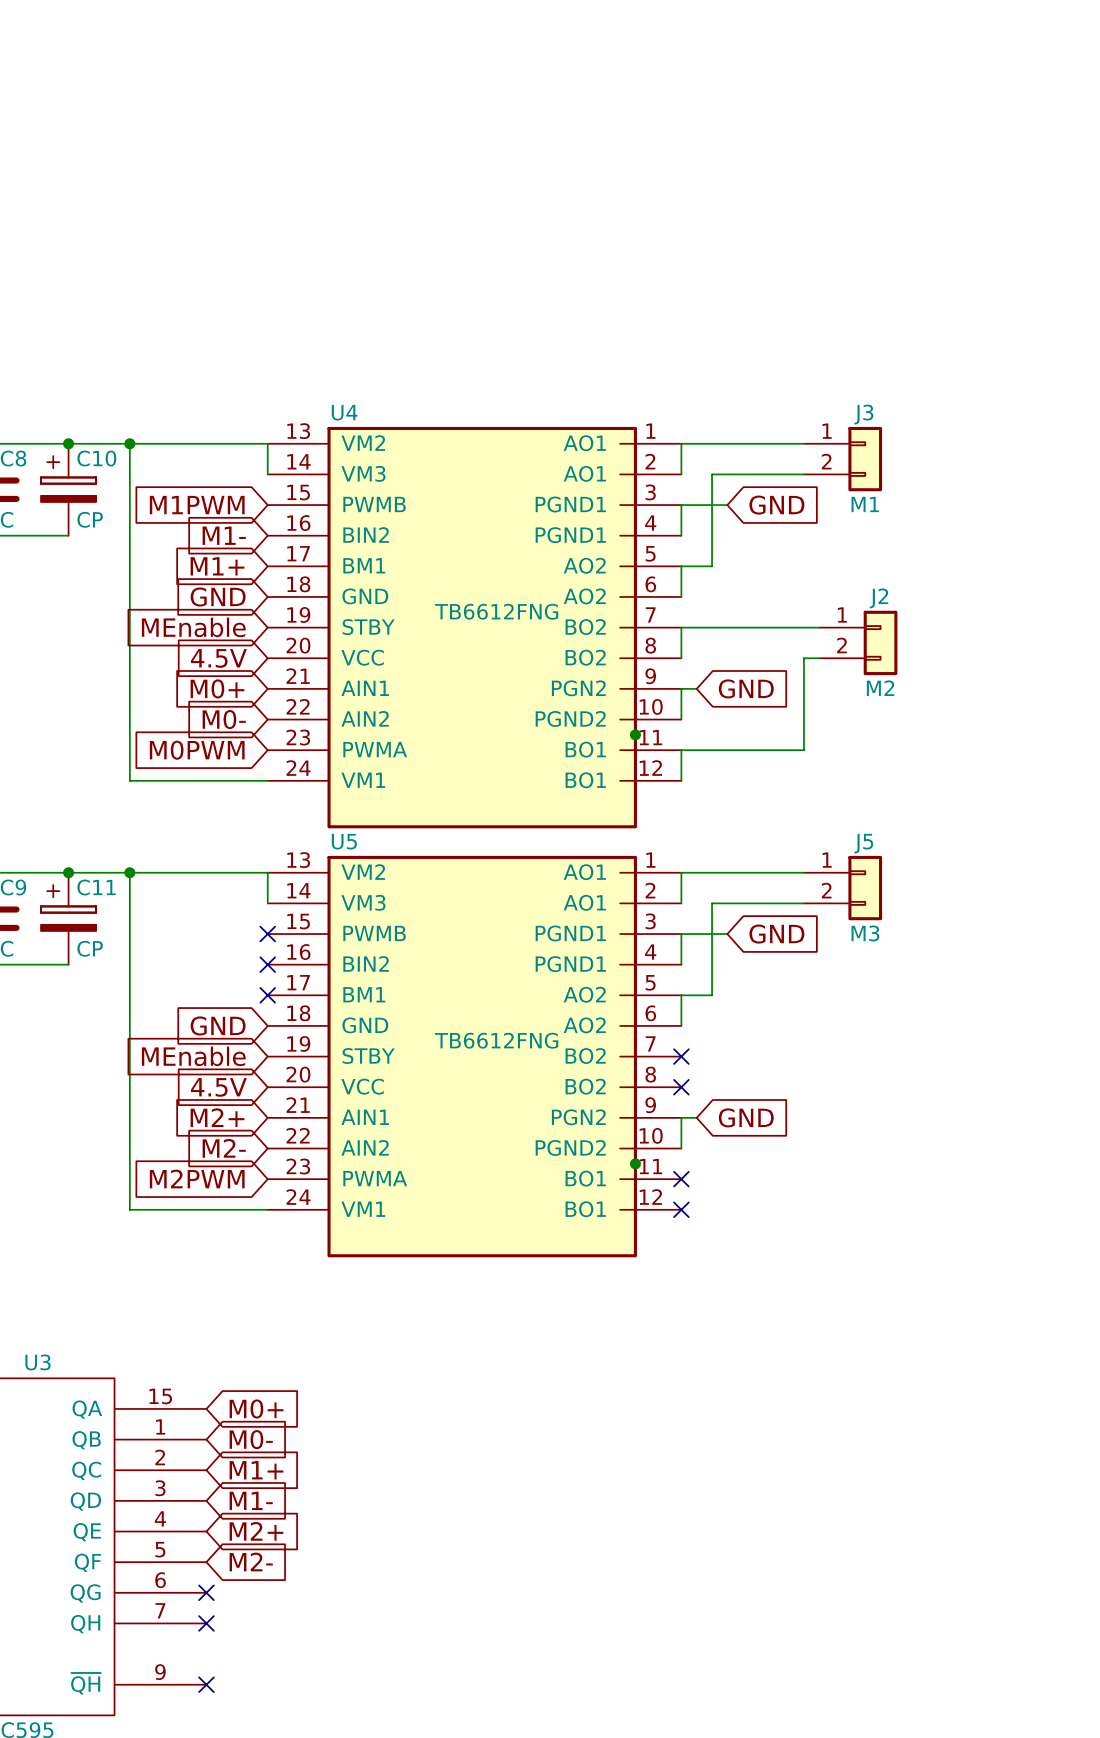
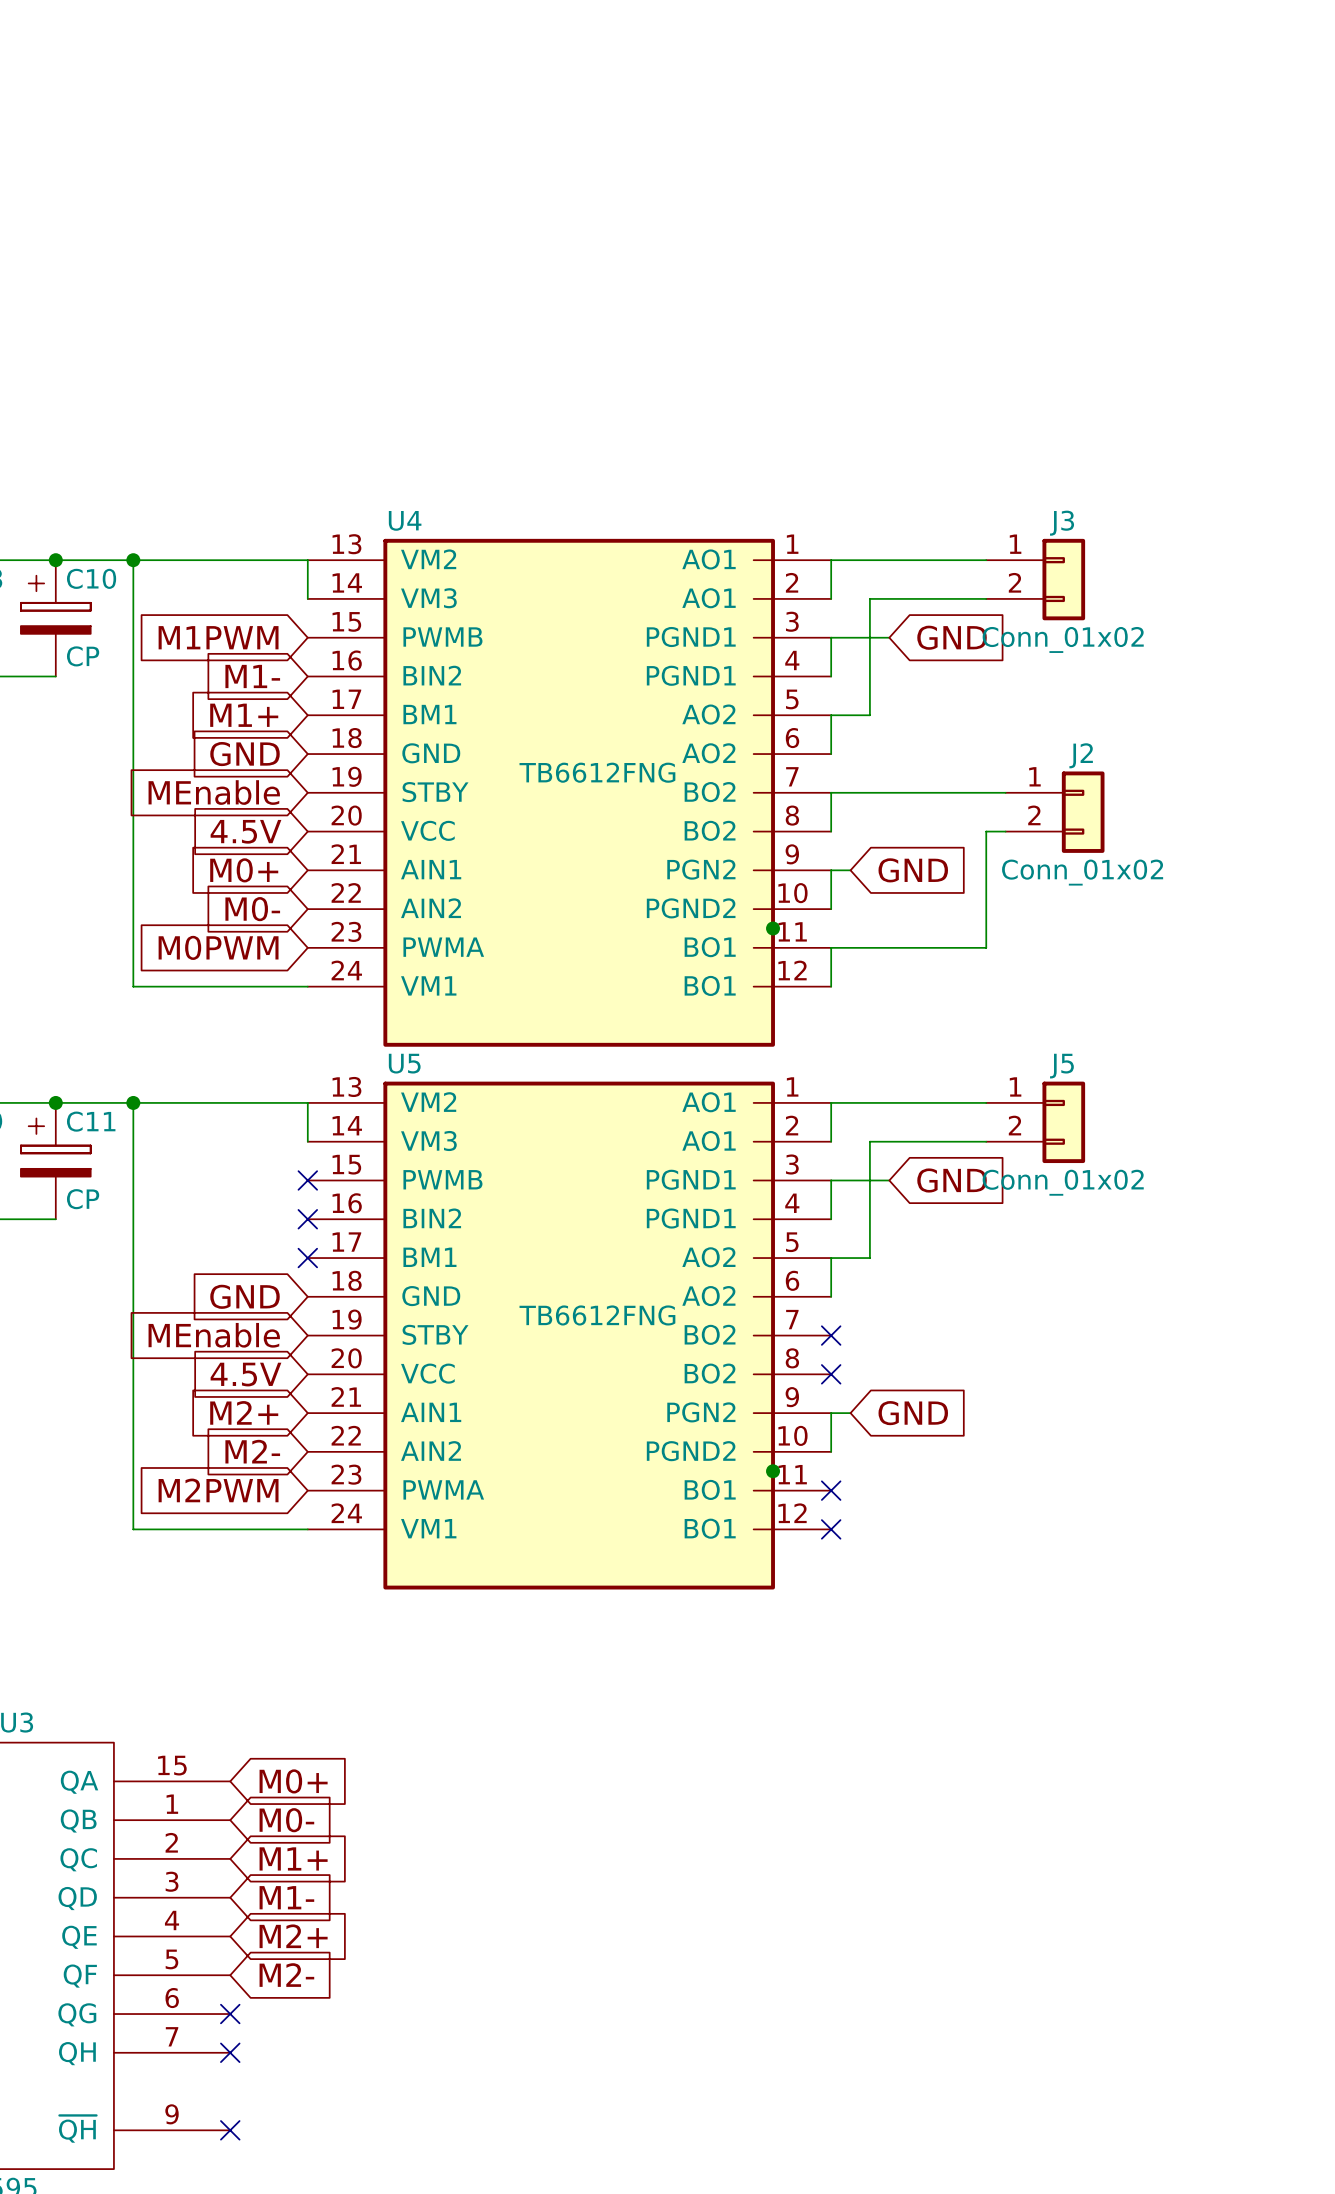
J3 value: M1 (865, 504) -> Conn_01x02 (1063, 639)
J2 value: M2 (880, 688) -> Conn_01x02 (1082, 872)
J5 value: M3 (865, 933) -> Conn_01x02 (1063, 1182)

